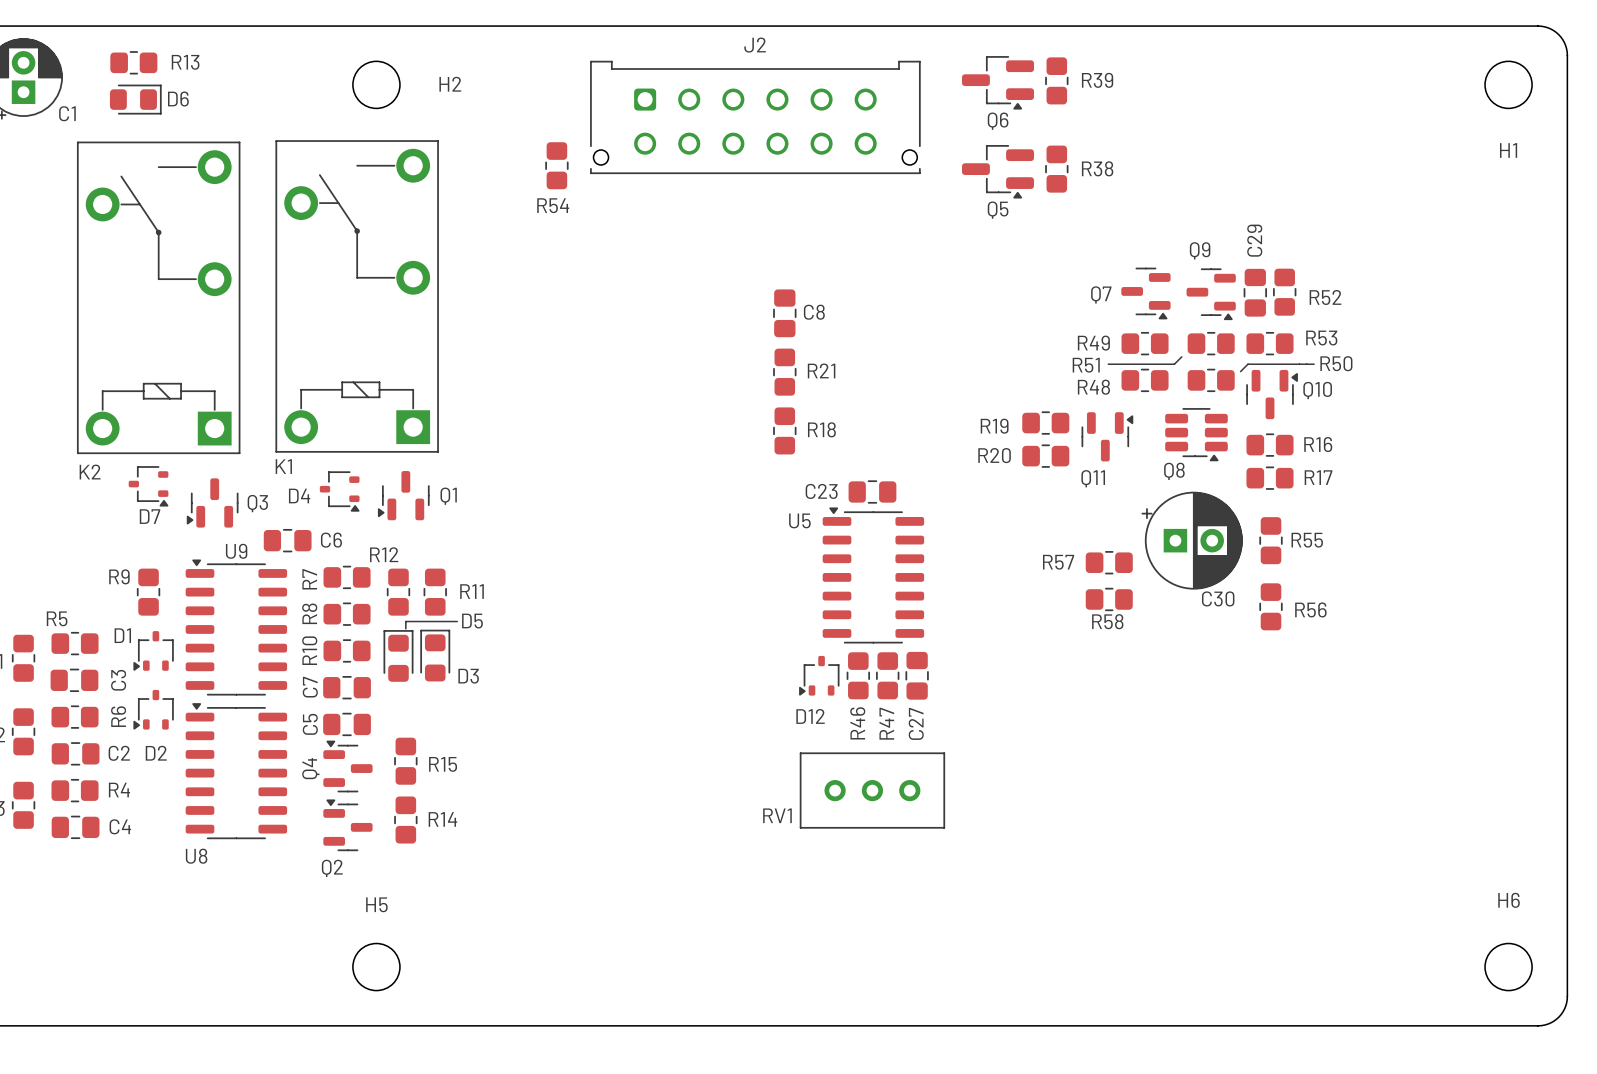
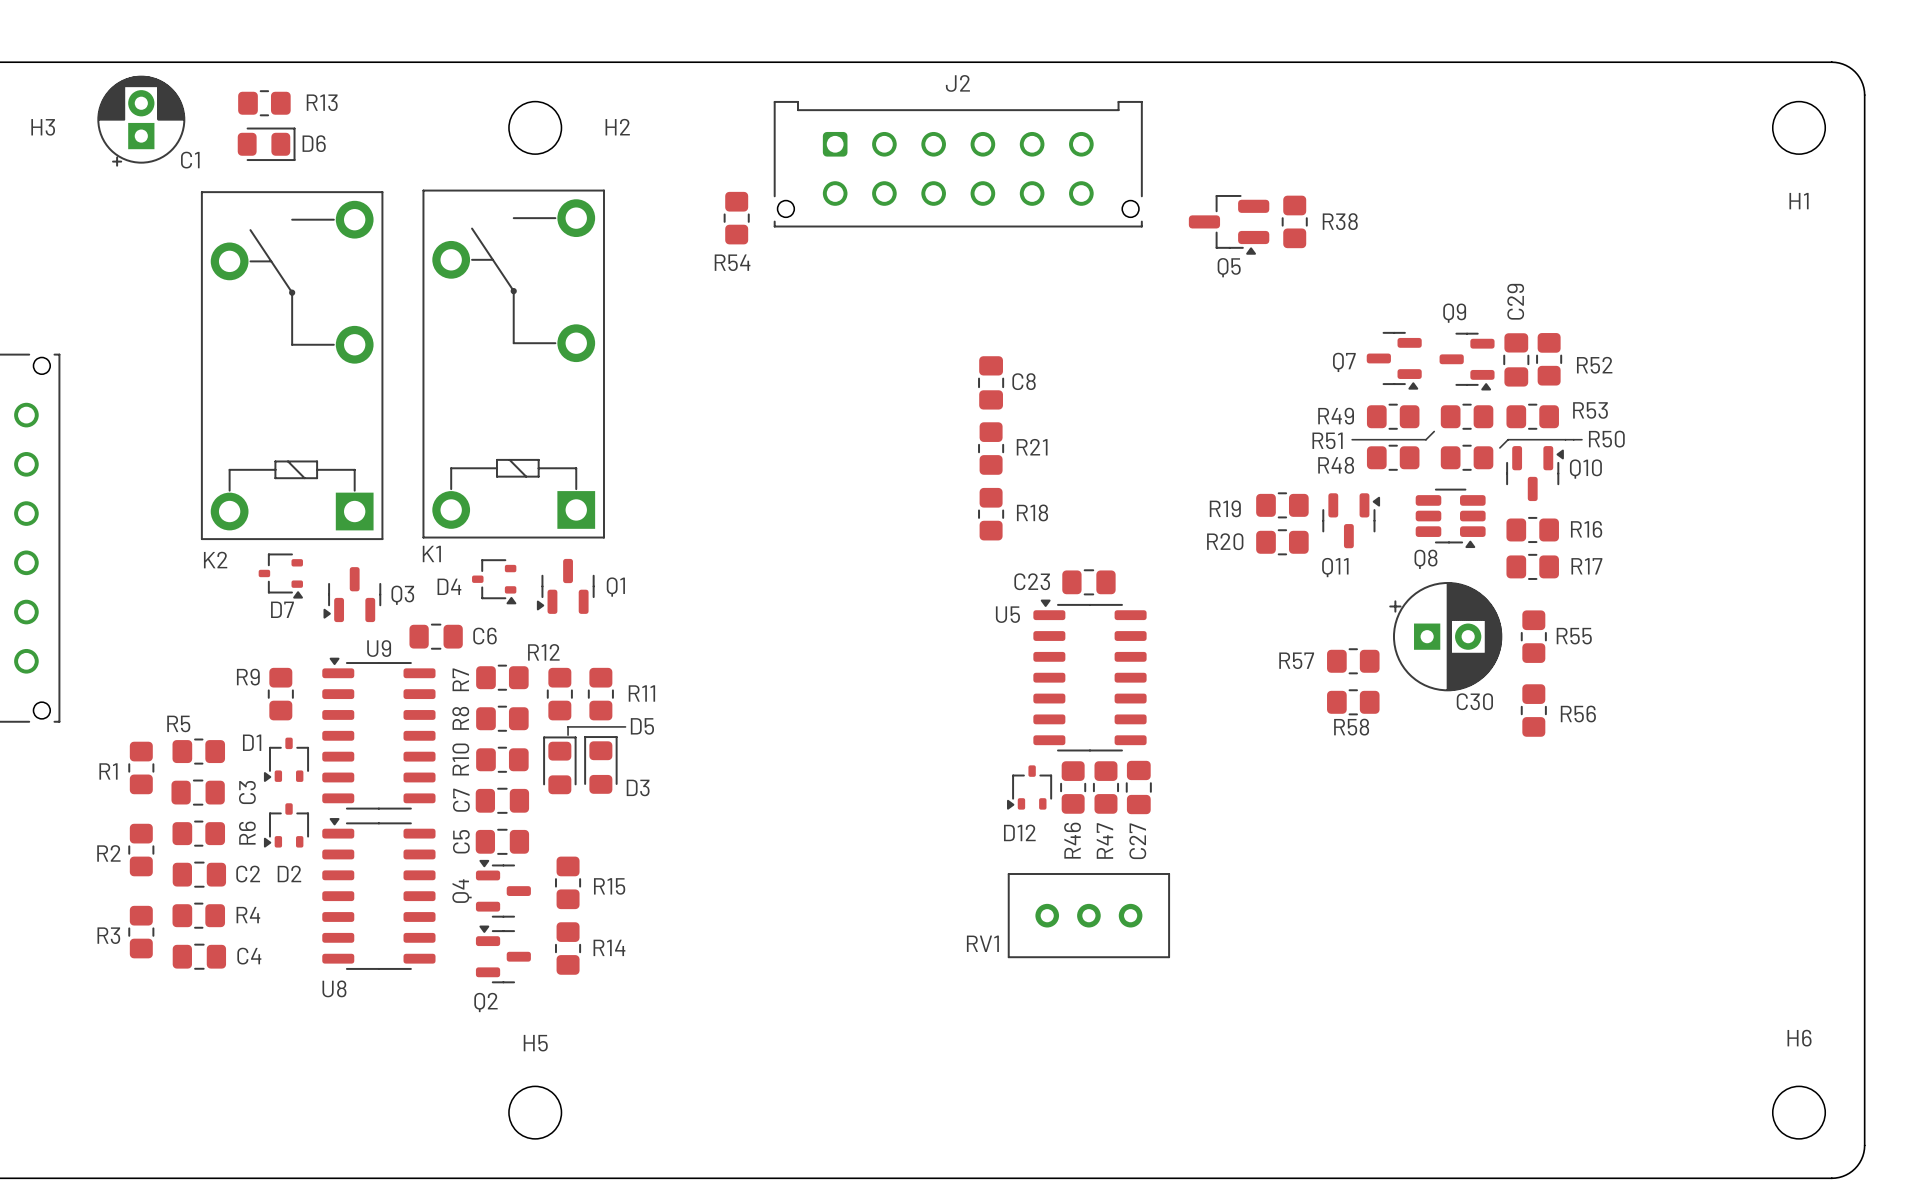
R39: (1056, 80) -> none
Q6: (998, 82) -> none

